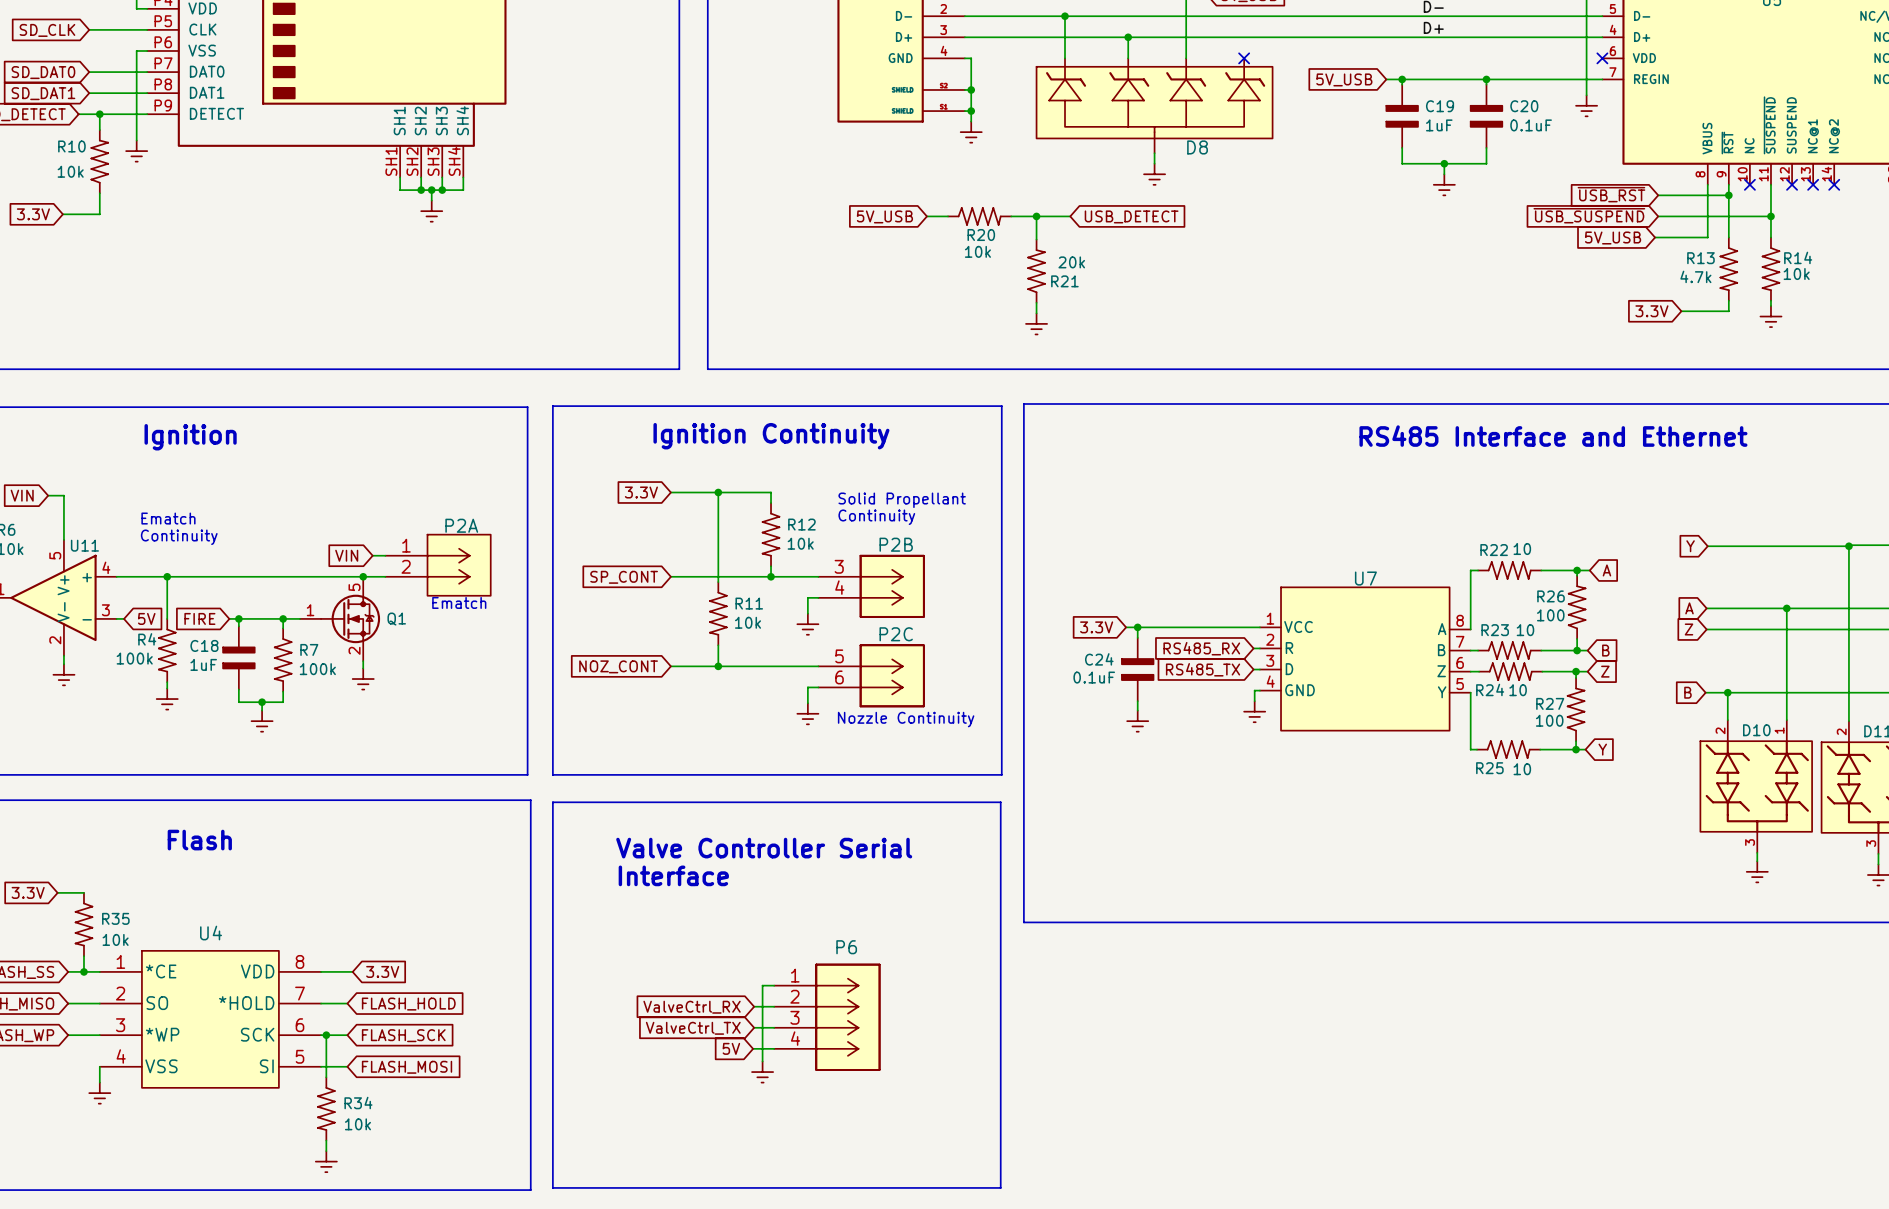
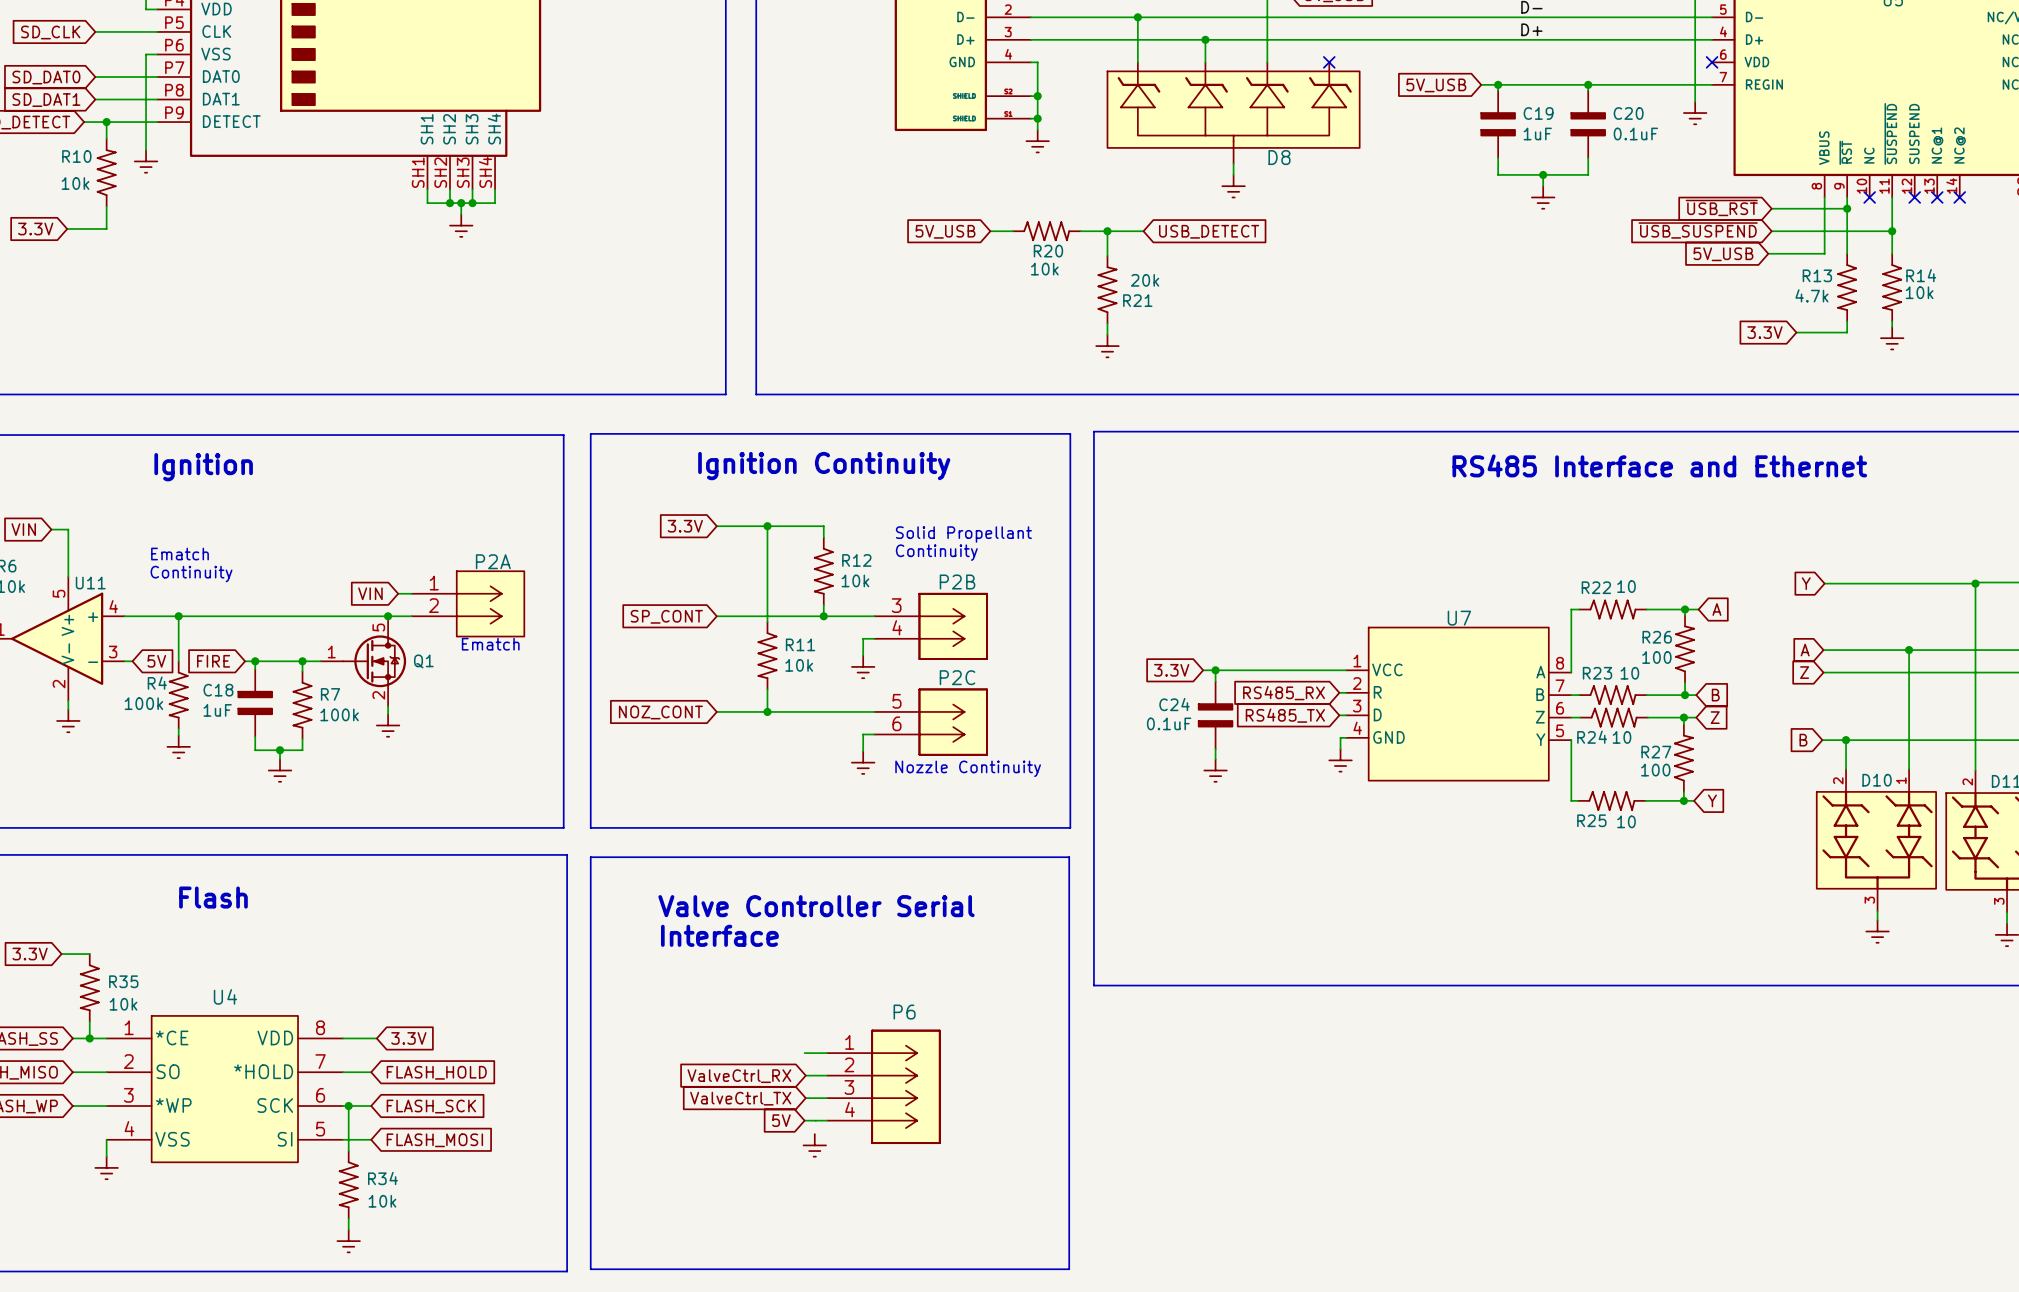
wire: (762, 985) (762, 1061) -> (814, 1053) (804, 1053)

